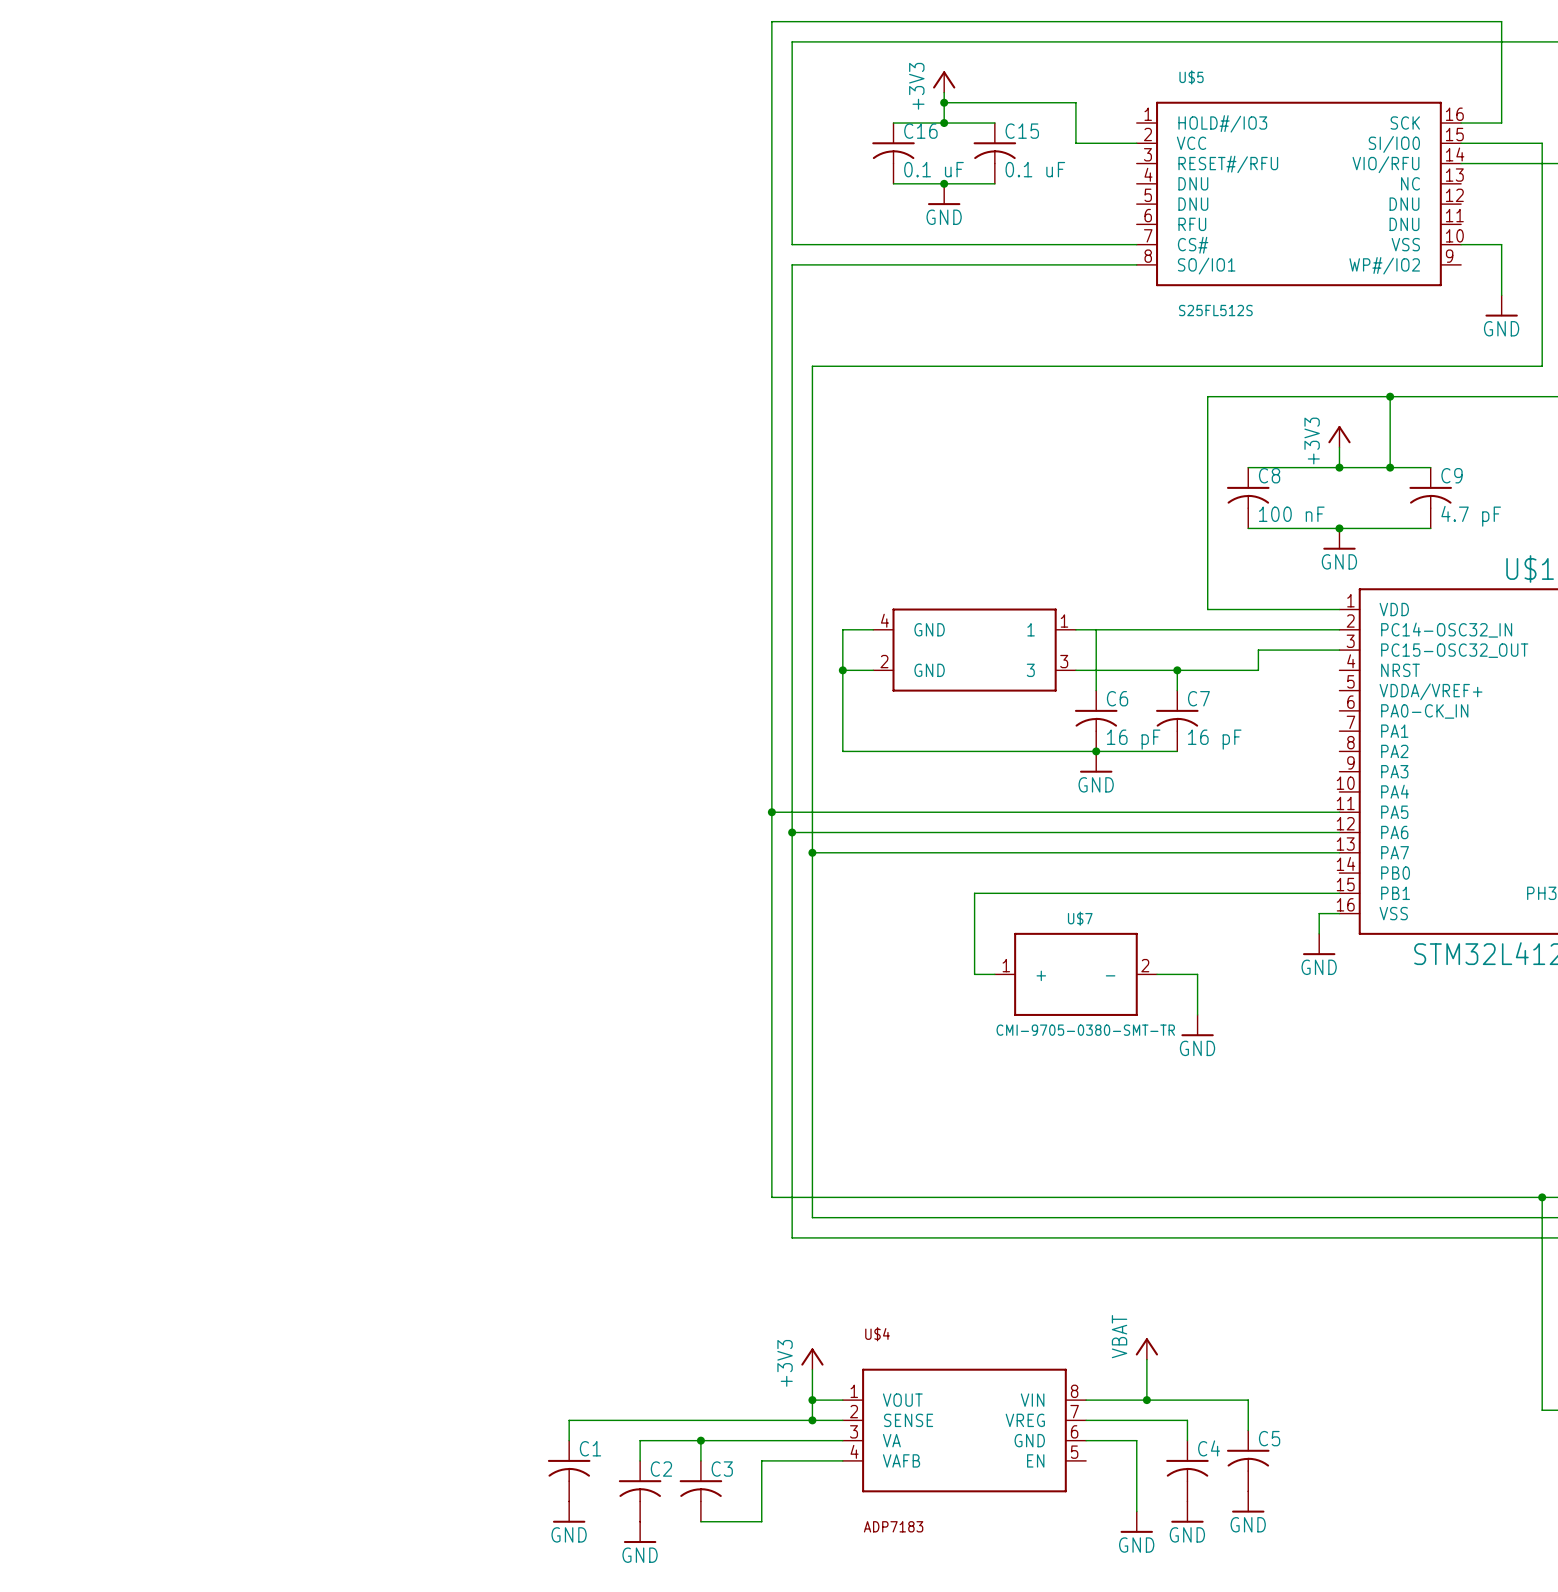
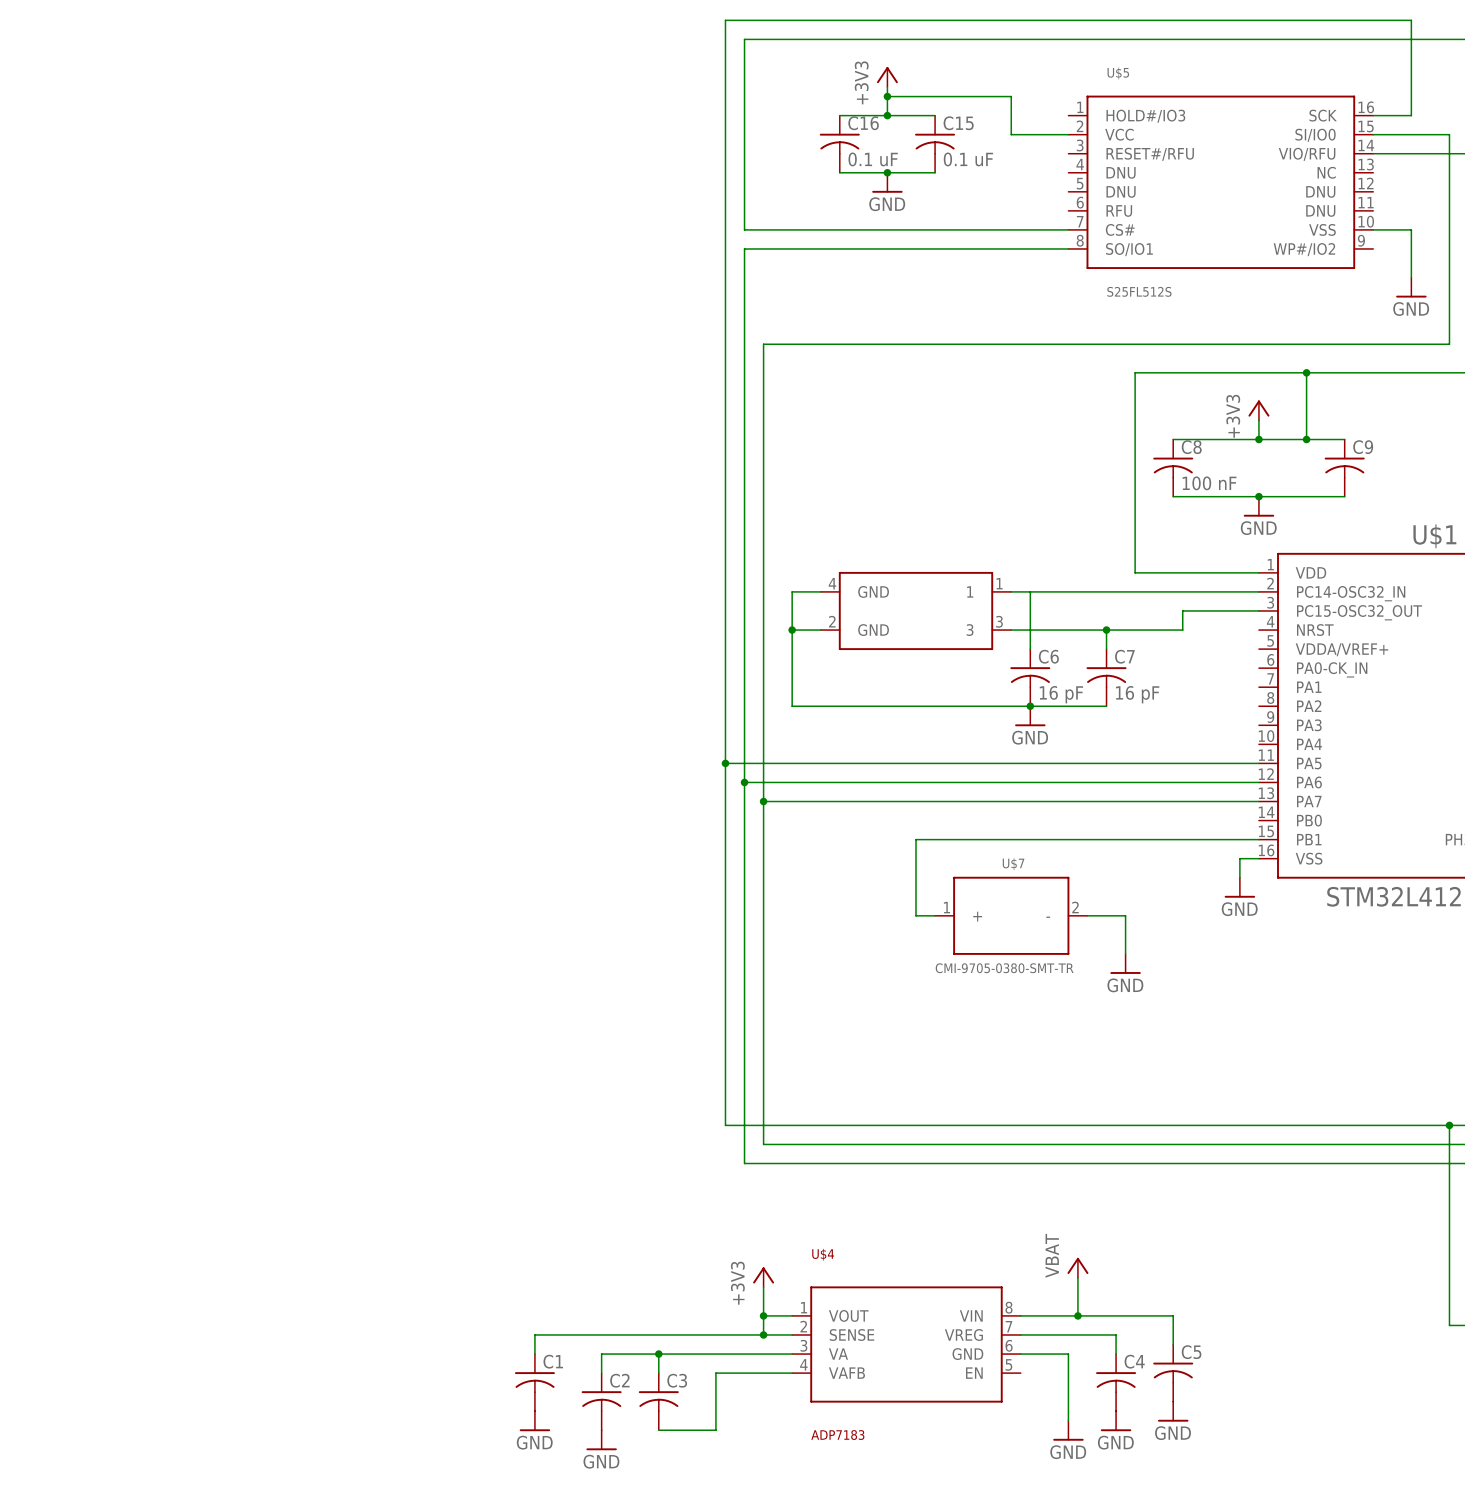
C9 value: 4.7 pF (1471, 516) -> none

